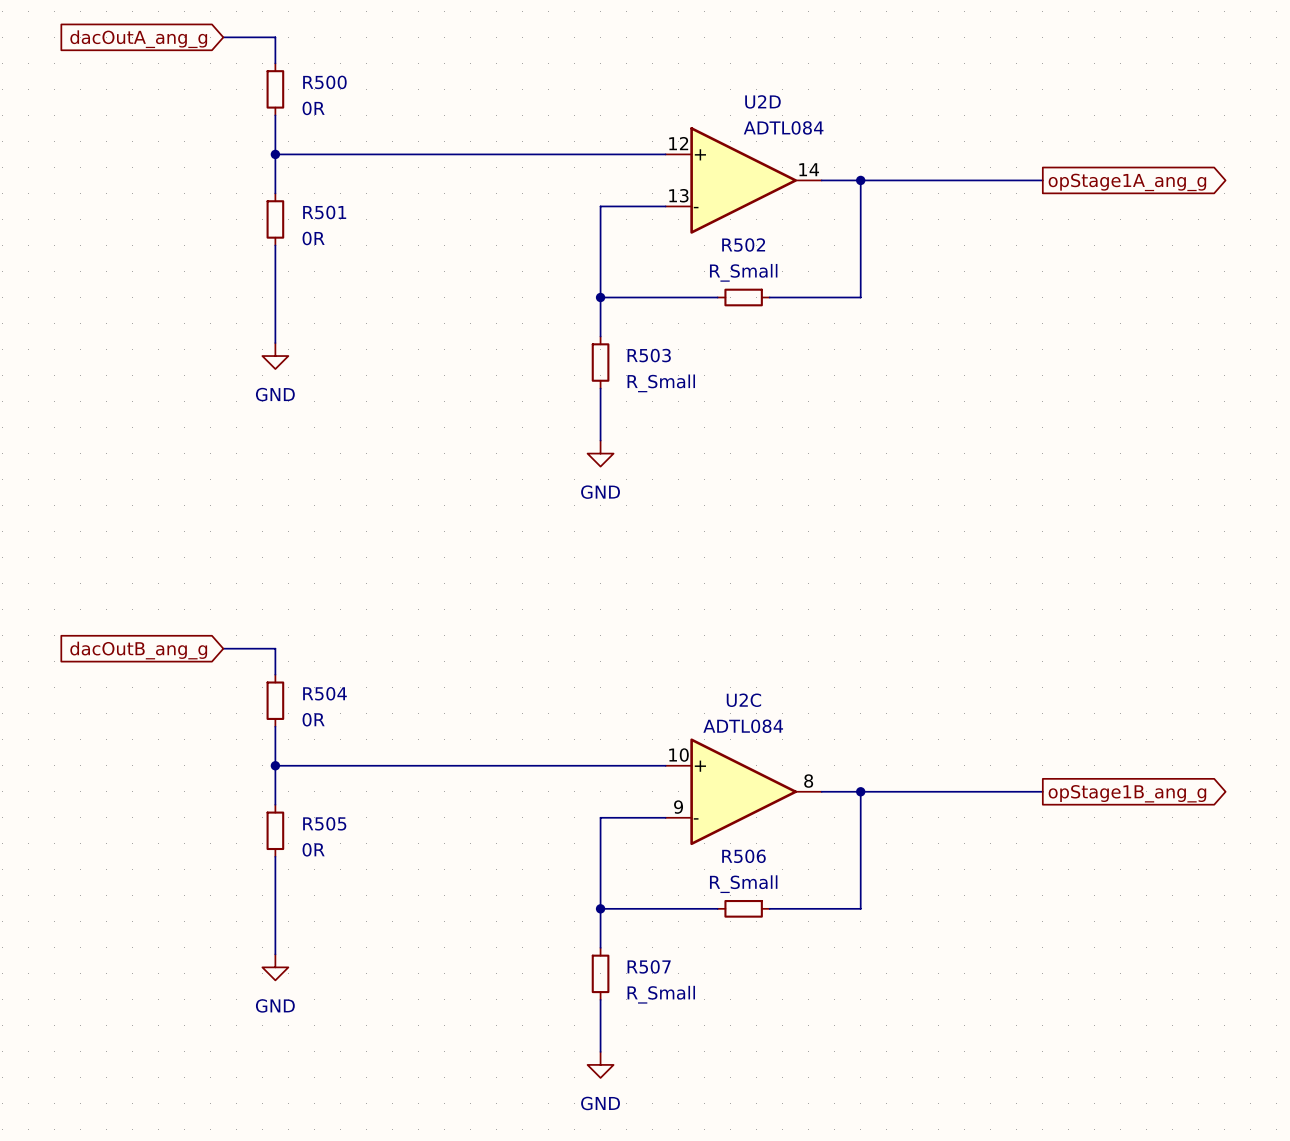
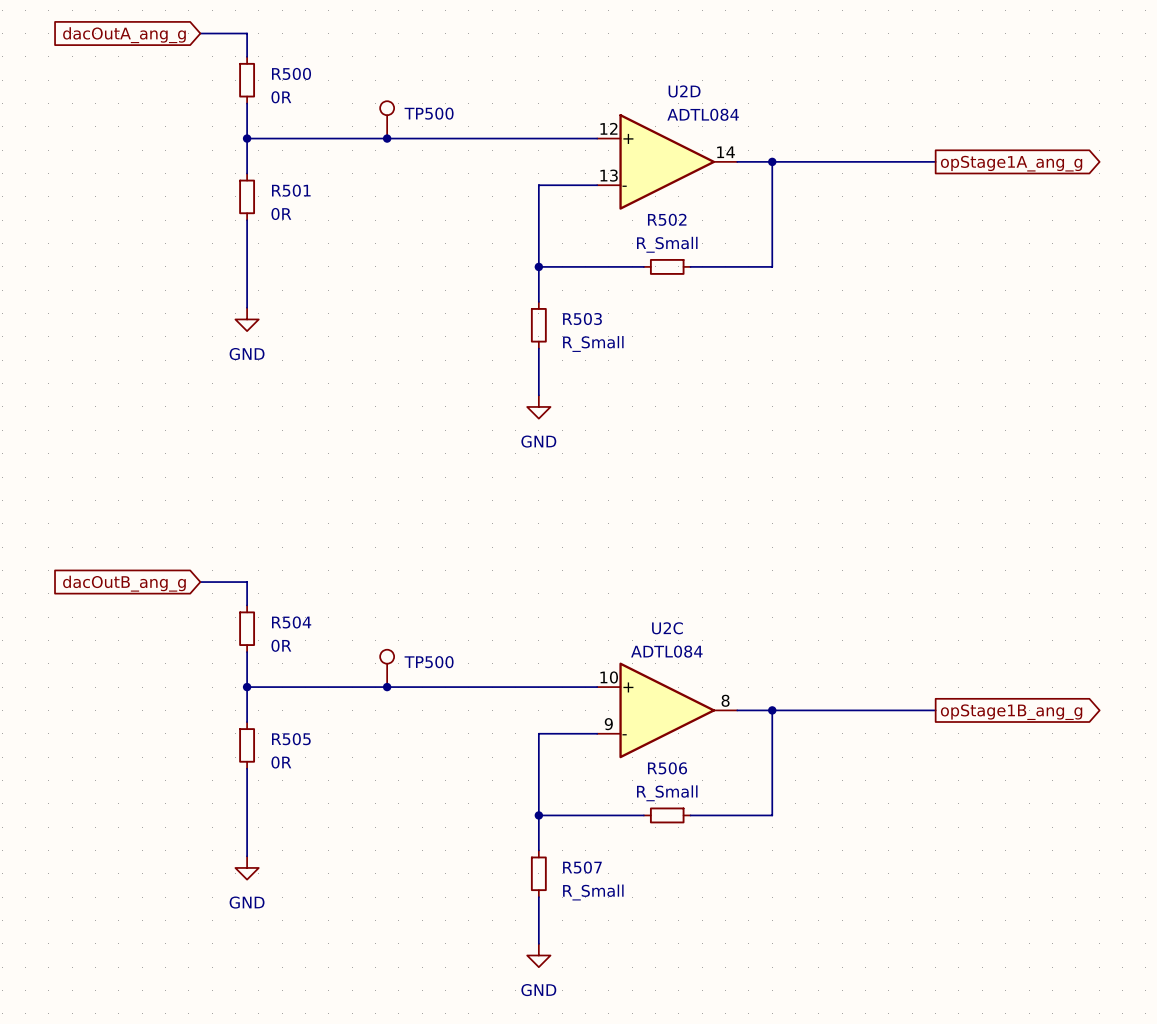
TP500: none -> (387, 119)
junction: none -> (387, 138)
TP500: none -> (387, 668)
junction: none -> (387, 687)

